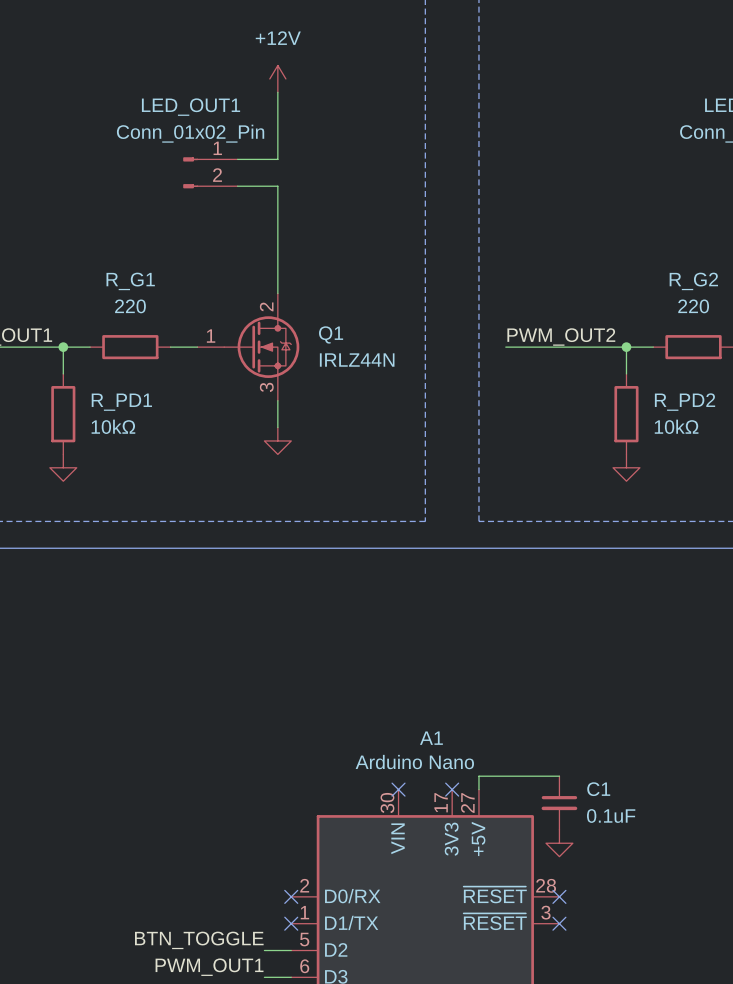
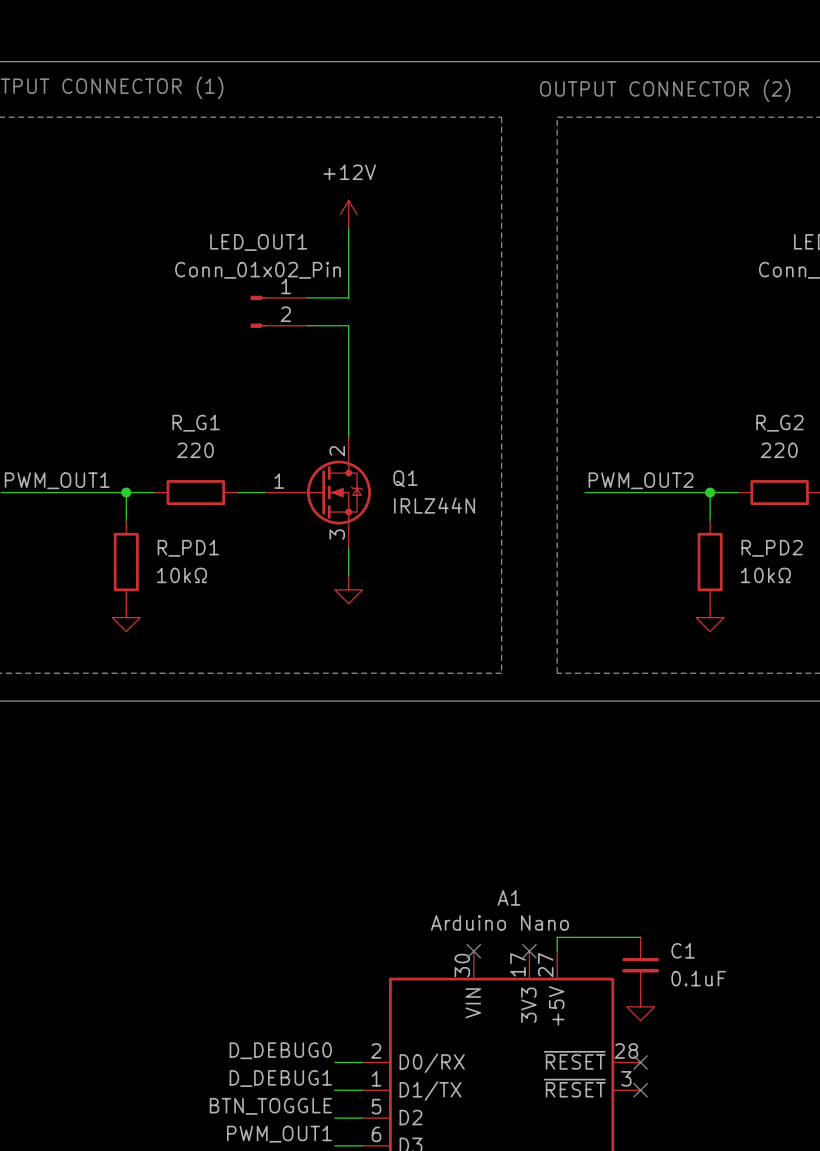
label: none -> D_DEBUG0 (280, 1050)
wire: none -> (334, 1062) (362, 1062)
no-connect mark: (291, 896) -> none
label: none -> D_DEBUG1 (280, 1078)
wire: none -> (334, 1090) (362, 1090)
no-connect mark: (291, 923) -> none

